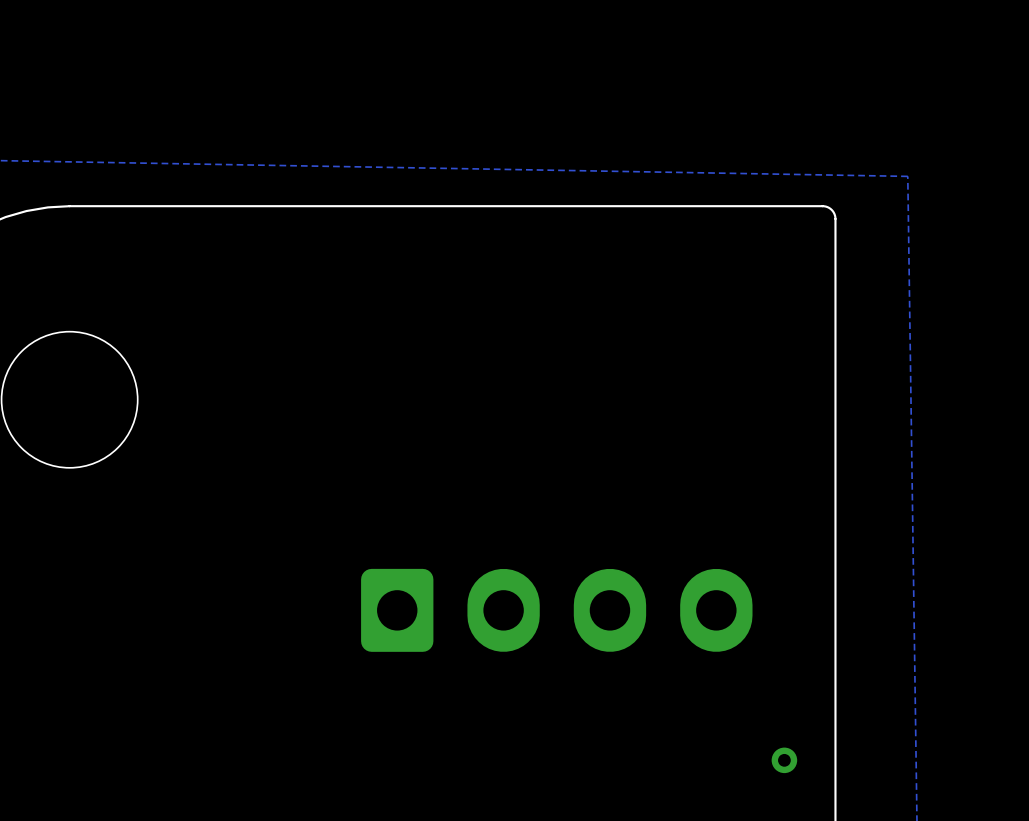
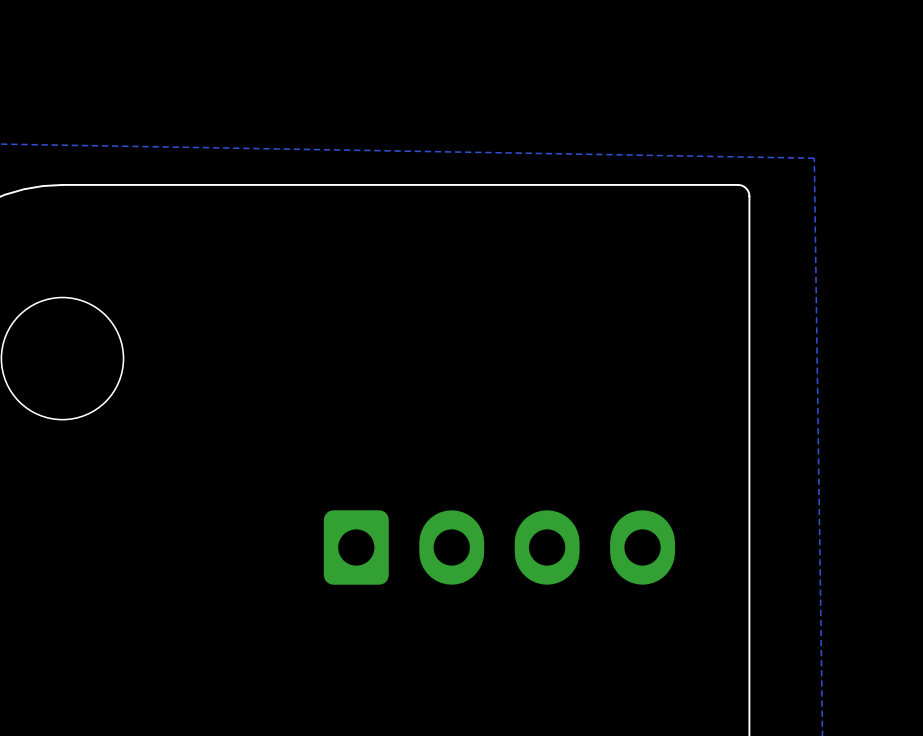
via: (784, 760) -> none

